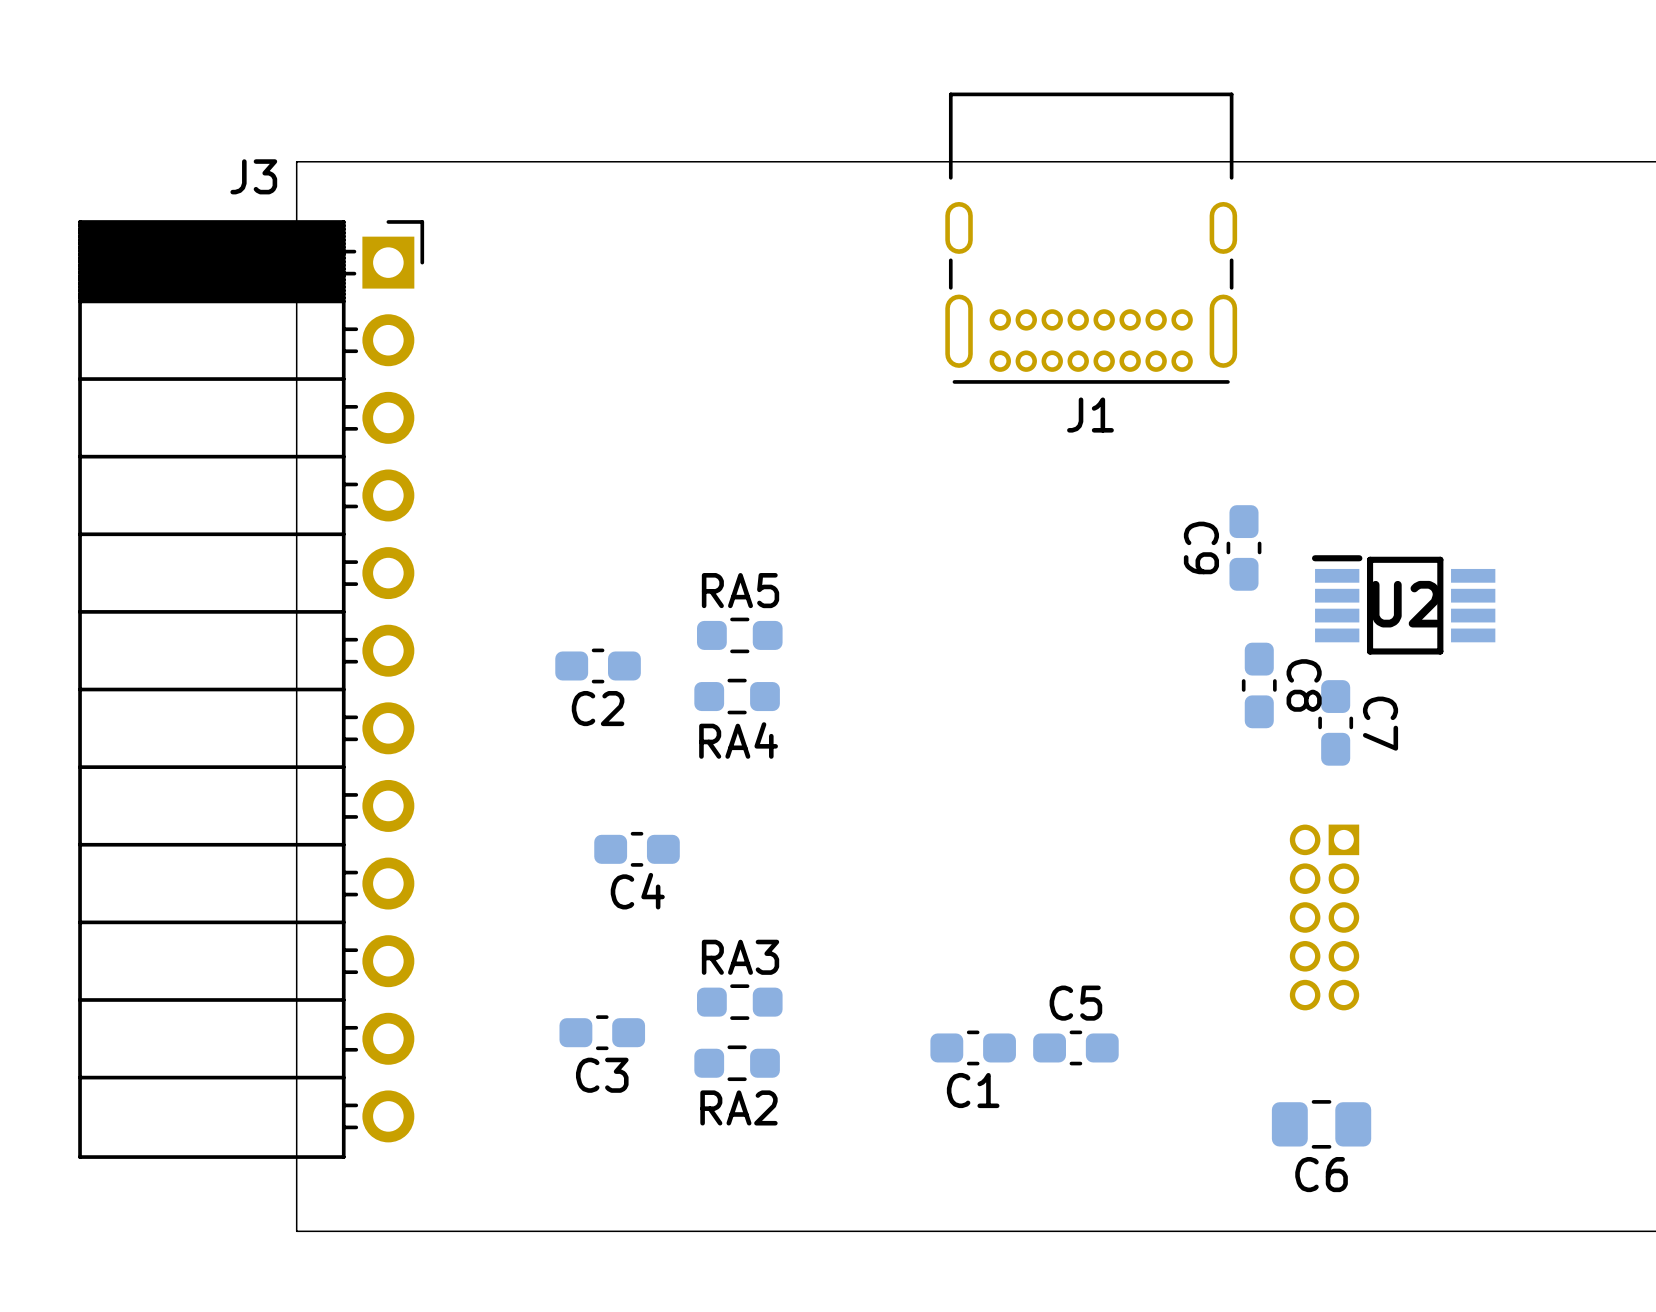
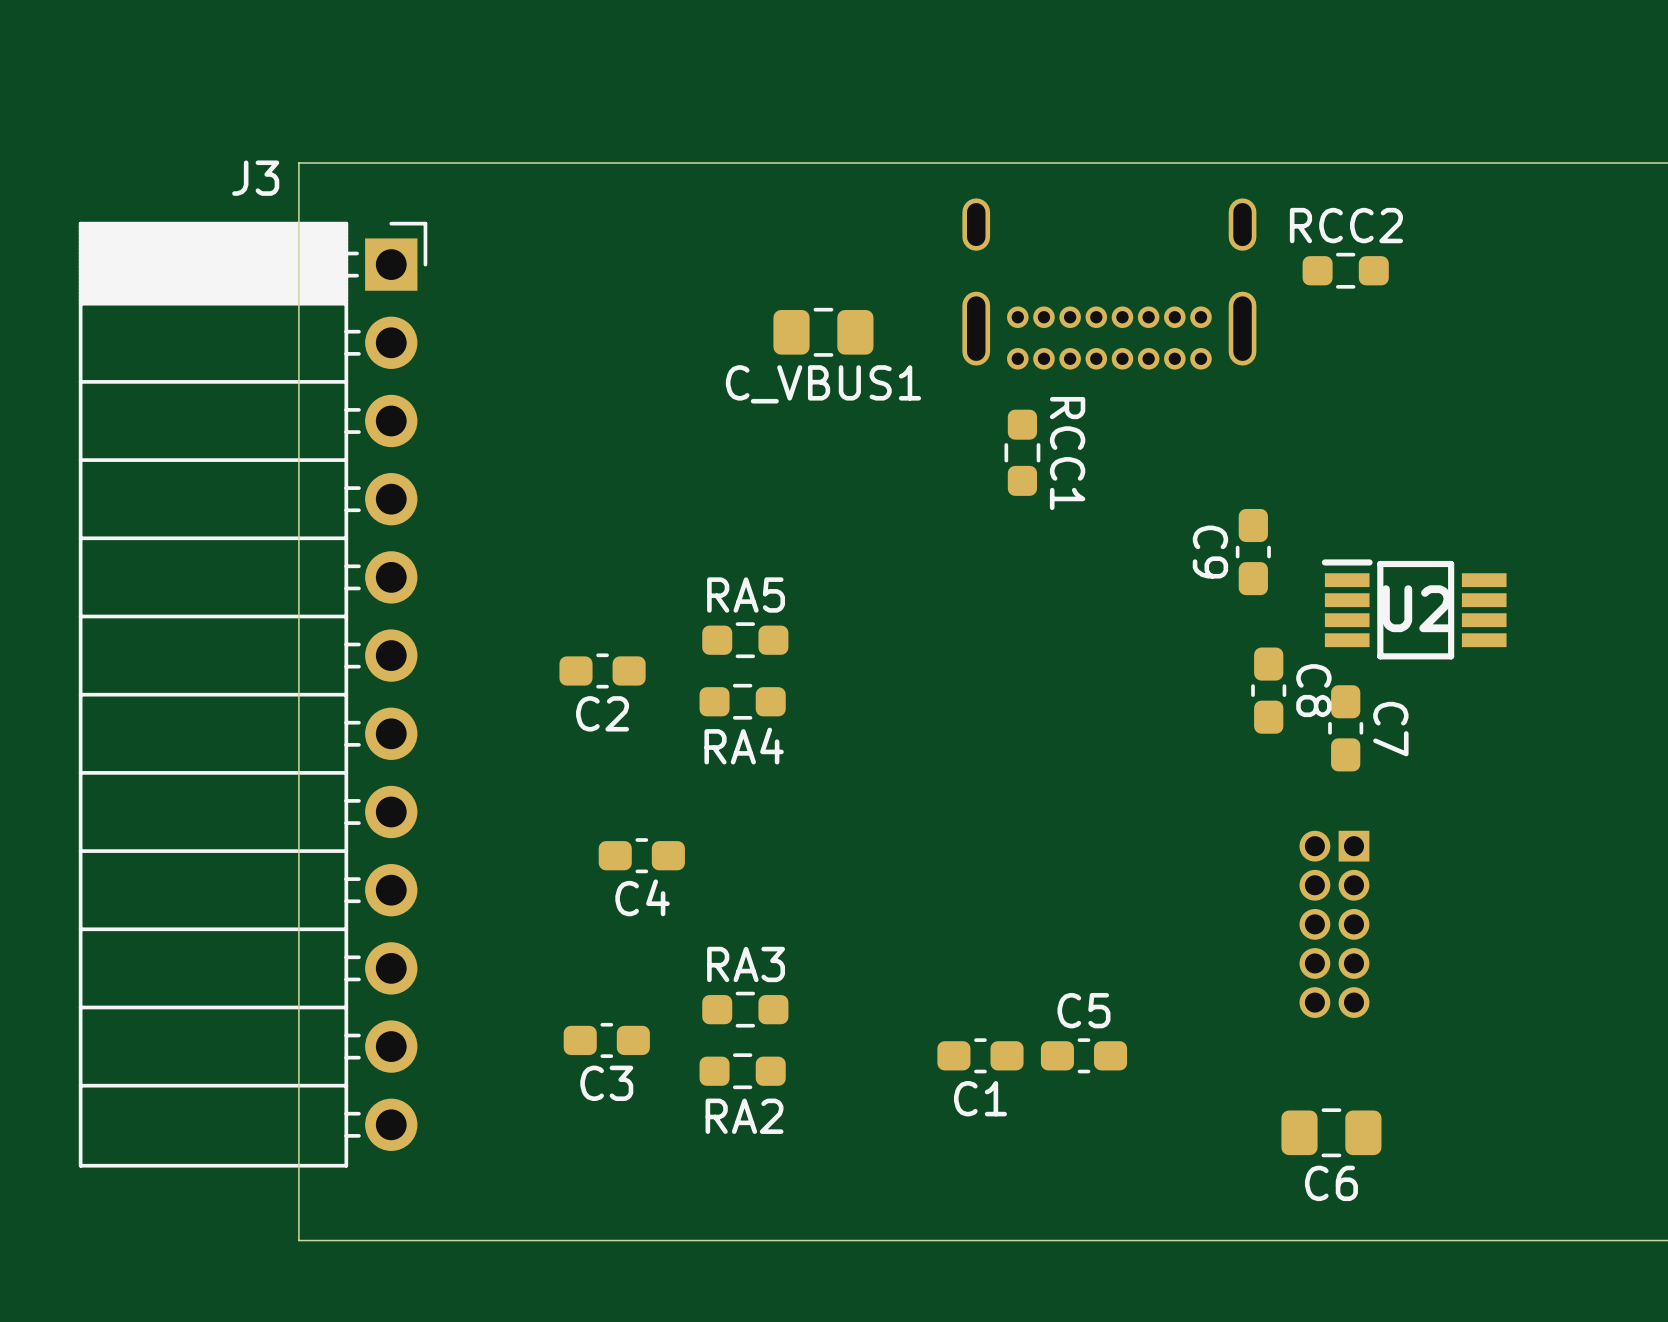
J1 side: bottom (1091, 238) -> top (1109, 283)
RCC2: none -> (1345, 270)
C_VBUS1: none -> (823, 332)
RCC1: none -> (1022, 452)

